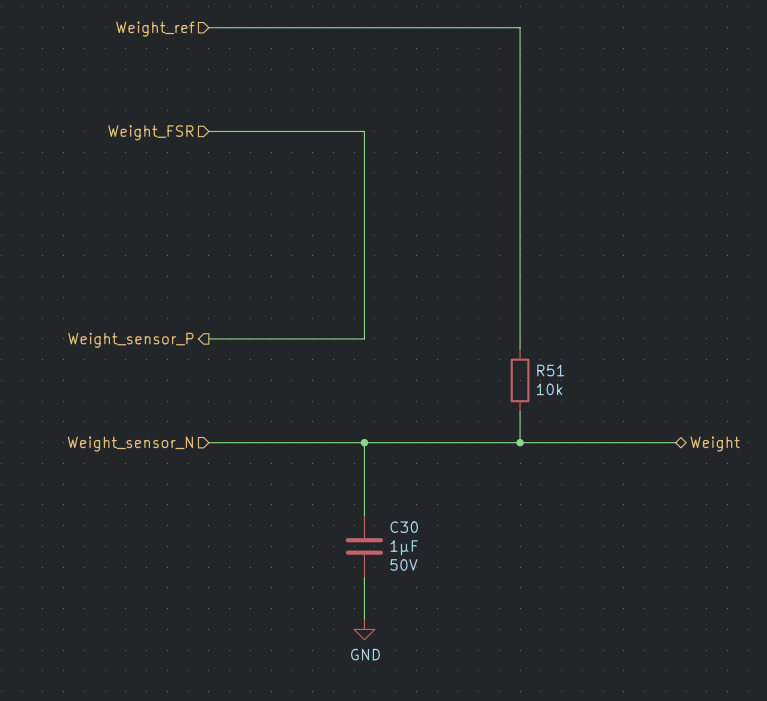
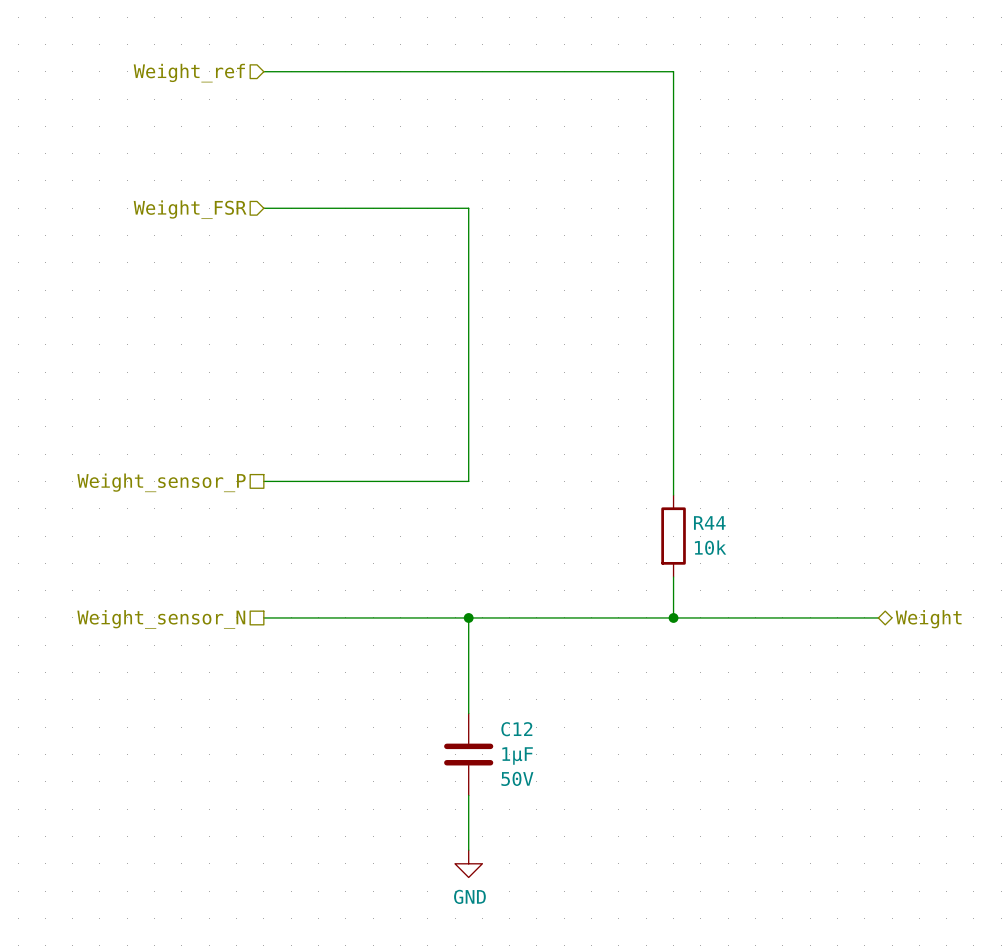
hierarchical label shape: output (130, 340) -> passive (161, 482)
R51 name: R51 (550, 370) -> R44 (709, 522)
hierarchical label shape: input (130, 444) -> passive (161, 619)
C30 name: C30 (404, 527) -> C12 (516, 729)

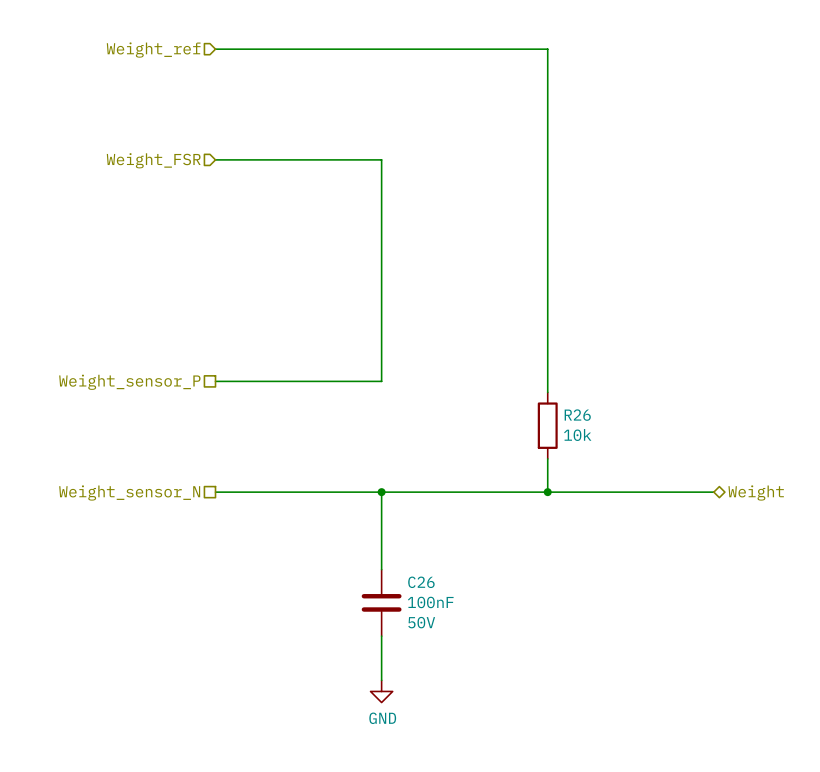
R44 name: R44 (709, 522) -> R26 (577, 415)
C12 name: C12 (516, 729) -> C26 (421, 582)
C12 value: 1µF (517, 756) -> 100nF (430, 602)

